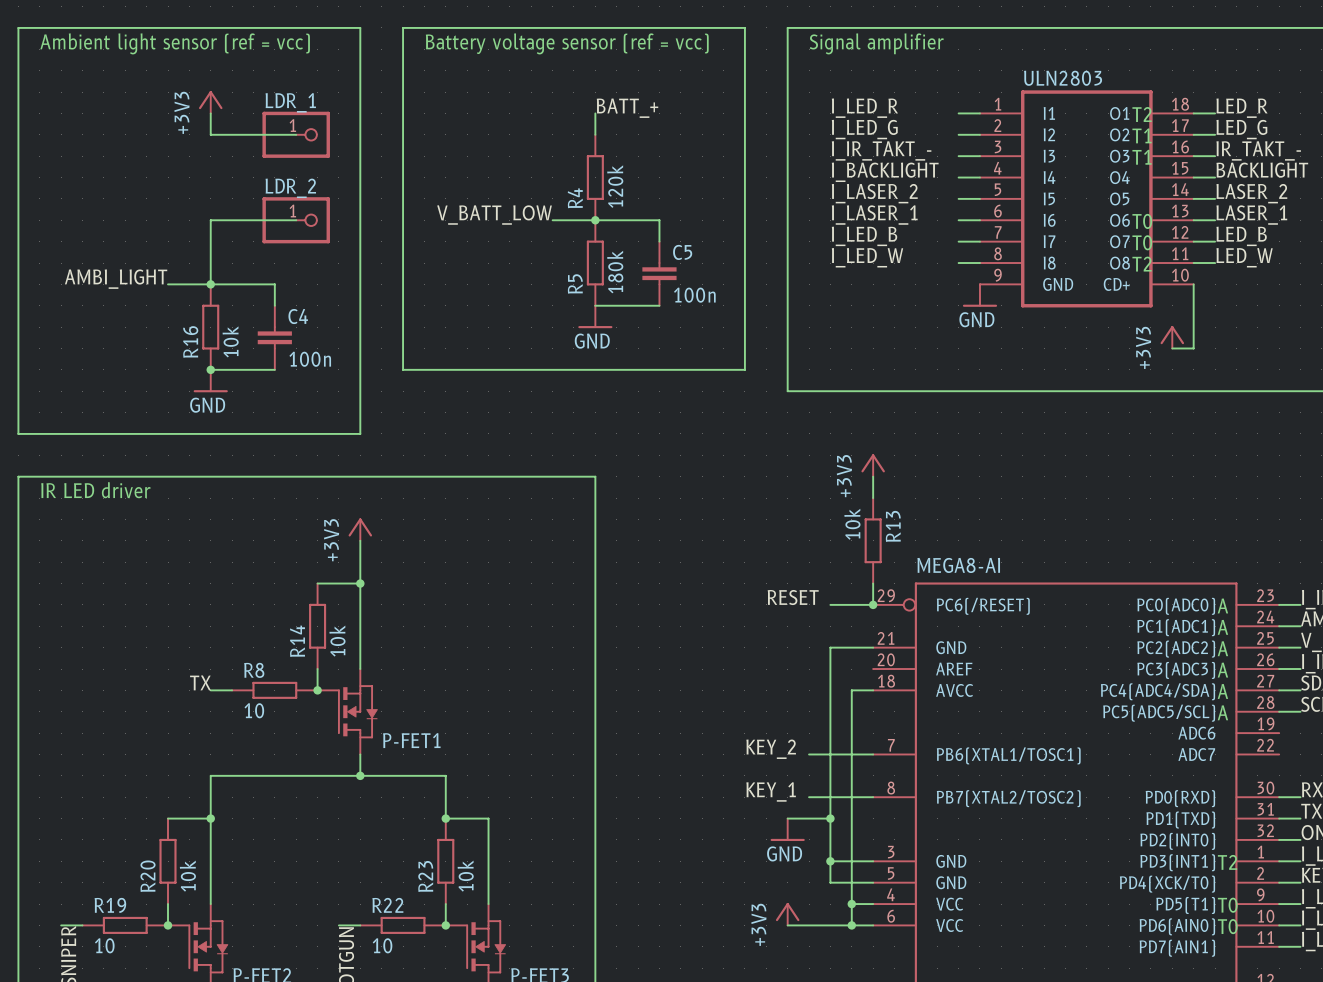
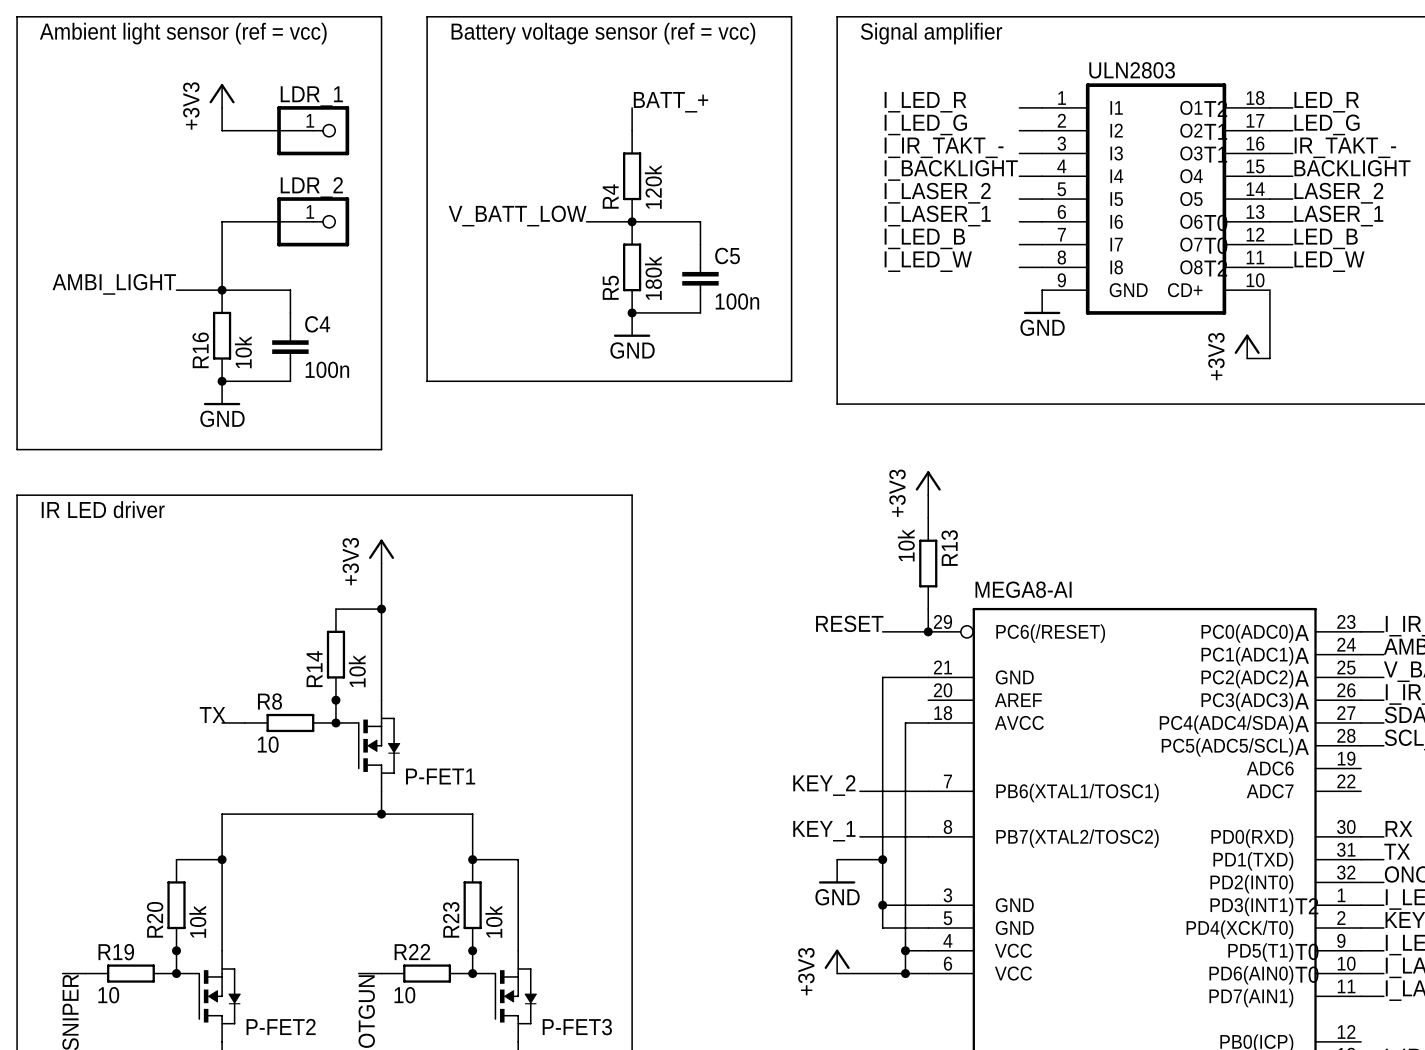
junction: none -> (632, 312)
junction: none -> (335, 700)
junction: none -> (176, 950)
junction: none -> (472, 950)

